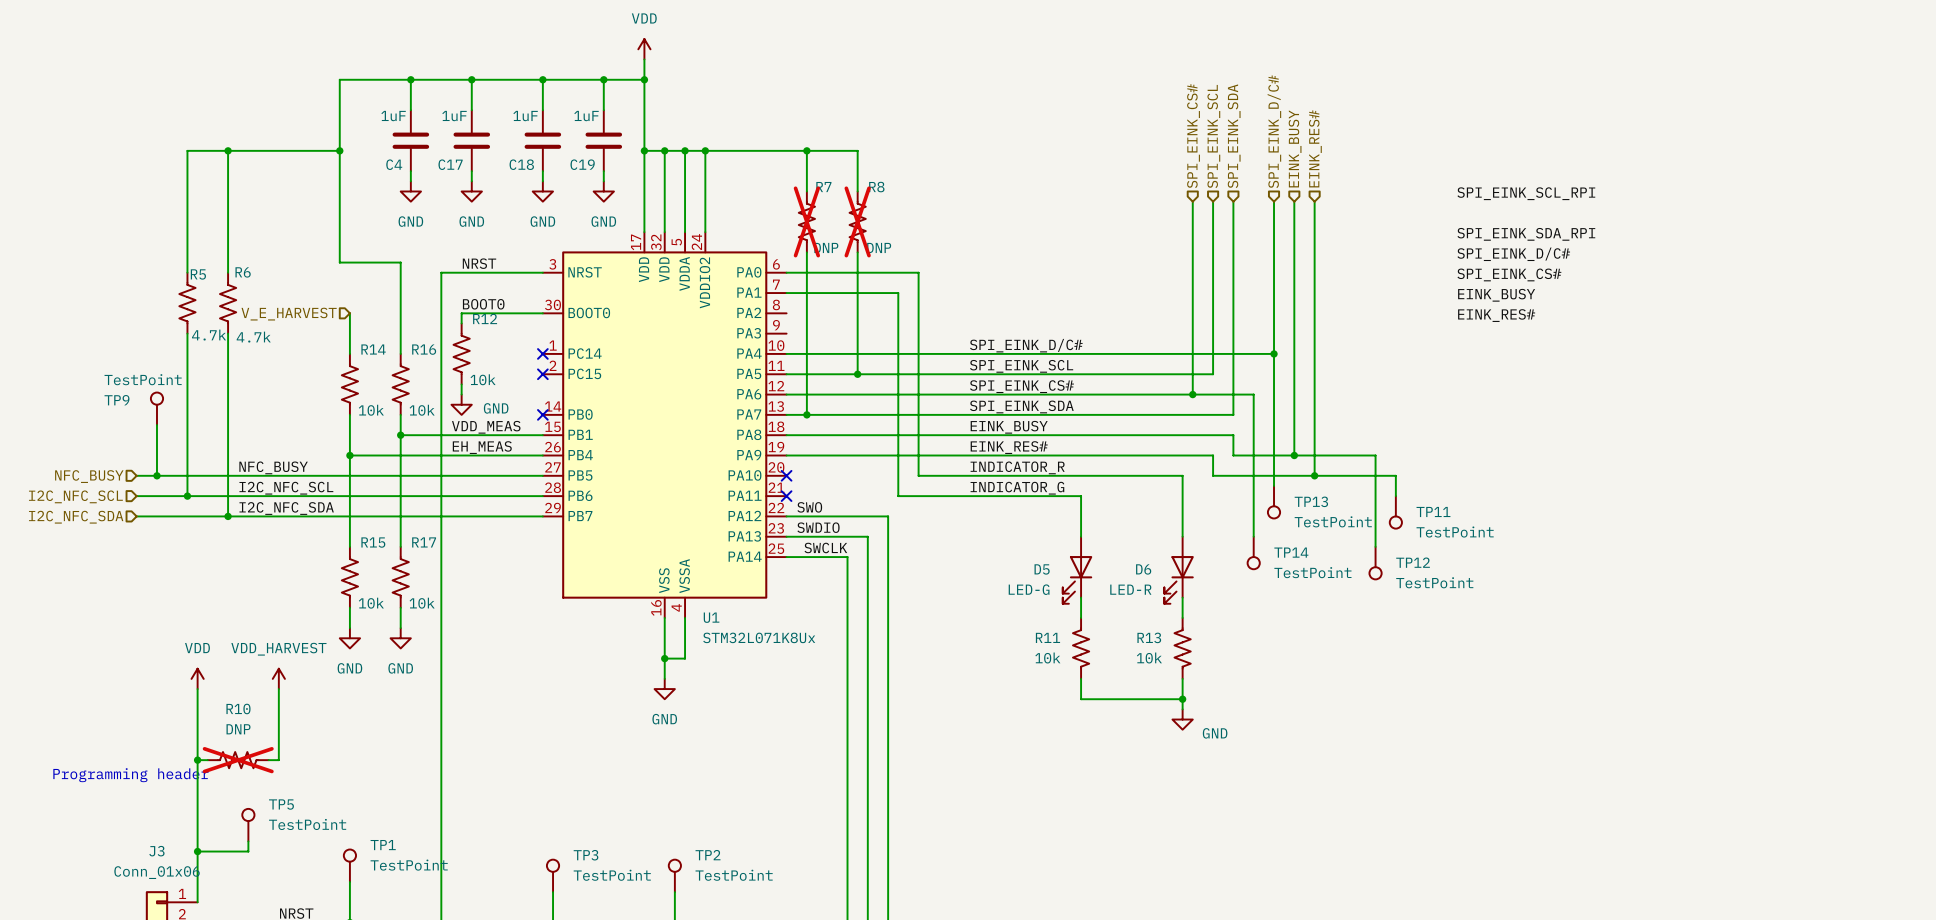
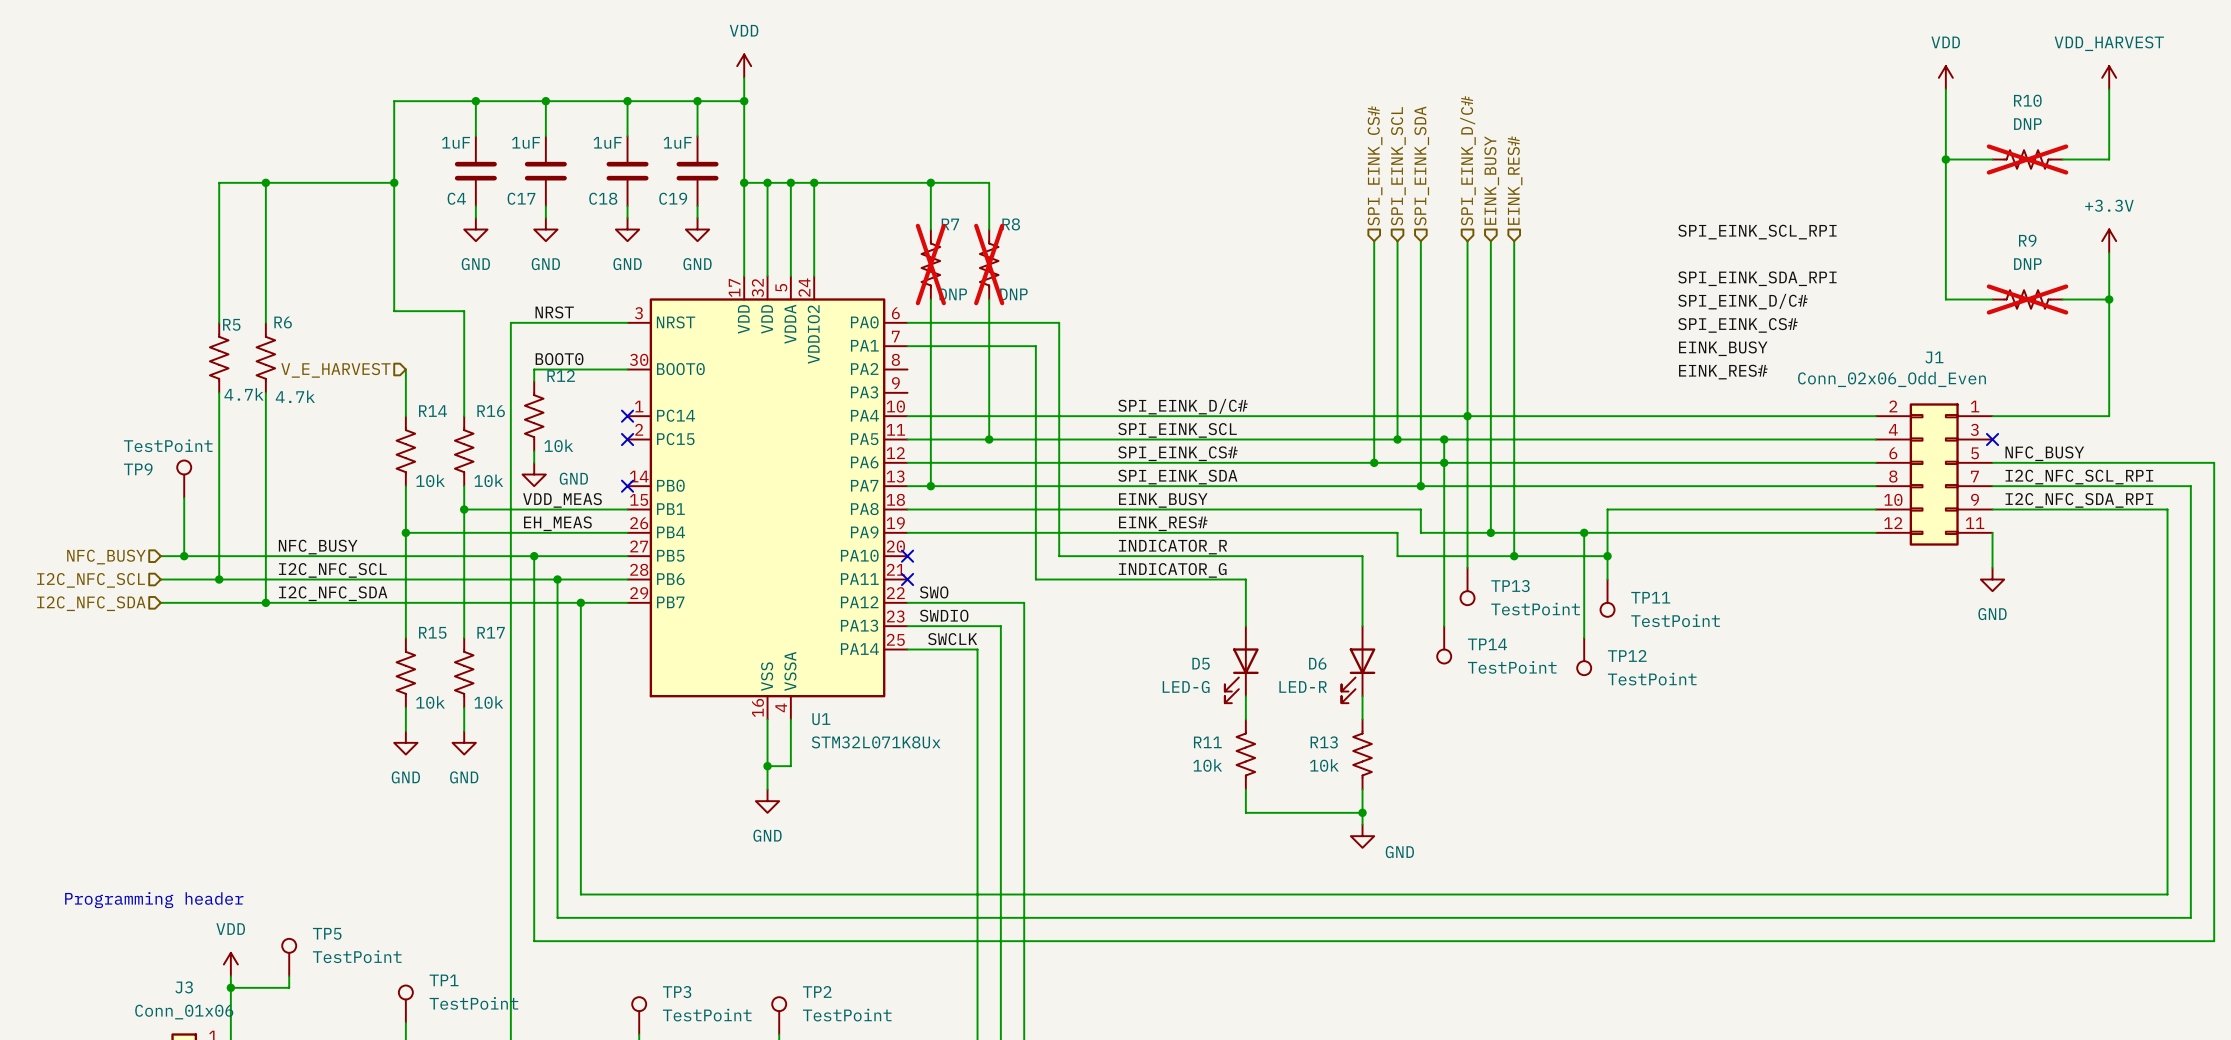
power symbol: none -> VDD (1945, 77)
power symbol: none -> VDD_HARVEST (2109, 77)
wire: none -> (1945, 89) (1945, 299) (1992, 299)
wire: none -> (2109, 89) (2109, 159) (2062, 159)
wire: none -> (1945, 159) (1992, 159)
junction: none -> (1945, 159)
power symbol: none -> +3.3V (2109, 241)
wire: none -> (2109, 252) (2109, 416) (1992, 416)
R9: none -> DNP (2027, 299)
wire: none -> (2062, 299) (2109, 299)
junction: none -> (2109, 299)
wire: none -> (1467, 416) (1875, 416)
wire: none -> (1397, 439) (1875, 439)
junction: none -> (1397, 439)
wire: none -> (1444, 439) (1444, 462) (1875, 462)
junction: none -> (1444, 439)
no-connect mark: none -> (1992, 439)
label: none -> NFC_BUSY (2044, 453)
junction: none -> (1444, 462)
wire: none -> (1992, 462) (2214, 462) (2214, 941) (534, 941) (534, 556)
J1: none -> Conn_02x06_Odd_Even (1934, 474)
label: none -> I2C_NFC_SCL_RPI (2079, 477)
wire: none -> (1420, 486) (1875, 486)
junction: none -> (1420, 486)
wire: none -> (1992, 486) (2190, 486) (2190, 917) (557, 917) (557, 579)
label: none -> I2C_NFC_SDA_RPI (2079, 500)
wire: none -> (1875, 509) (1607, 509) (1607, 556)
wire: none -> (1992, 509) (2167, 509) (2167, 894) (580, 894) (580, 602)
wire: none -> (1584, 532) (1875, 532)
junction: none -> (1584, 532)
wire: none -> (1992, 532) (1992, 567)
junction: none -> (534, 556)
junction: none -> (1607, 556)
junction: none -> (557, 579)
power symbol: none -> GND (1992, 579)
junction: none -> (580, 602)
power symbol position: VDD (197, 678) -> VDD (230, 964)
power symbol: VDD_HARVEST (278, 678) -> none
wire: (197, 689) (197, 841) -> none
wire: (278, 689) (278, 760) (268, 760) -> none
wire: (197, 760) (207, 760) -> none
junction: (197, 760) -> none
R10 position: (238, 760) -> (2027, 159)

